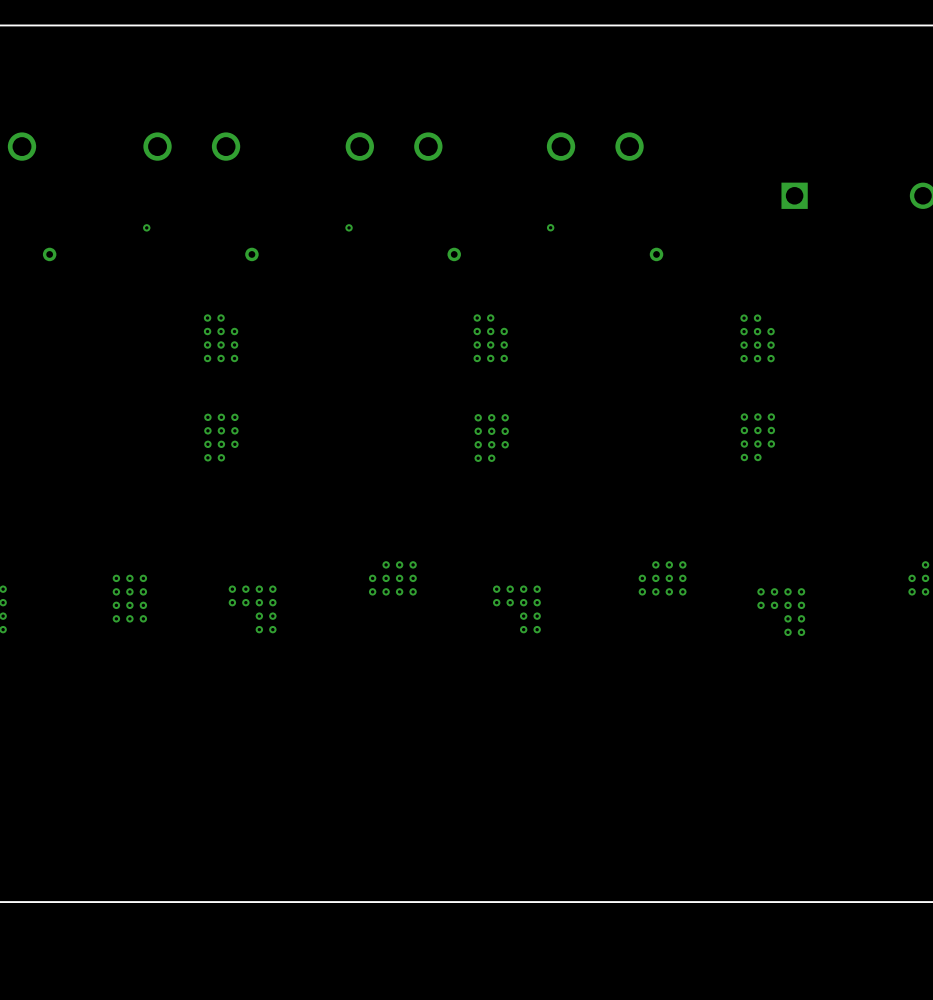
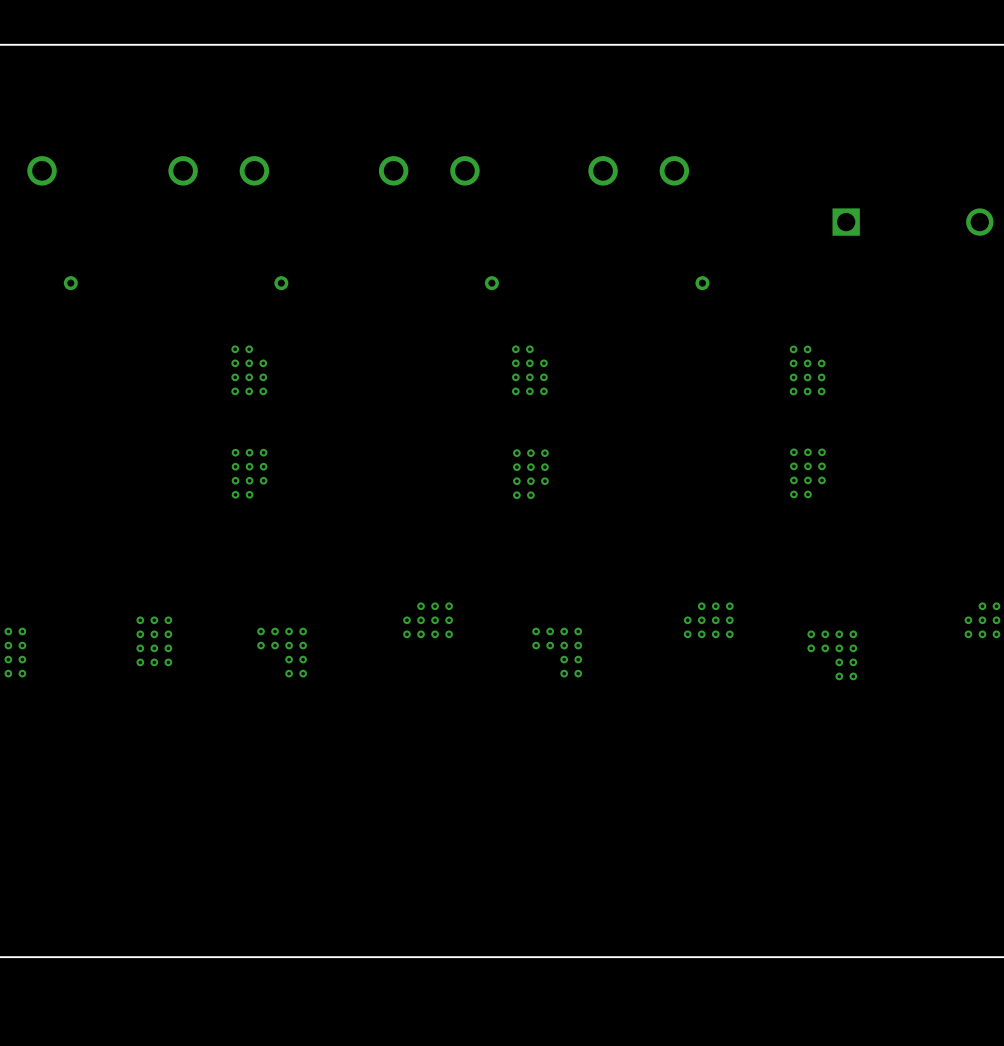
via: (146, 227) -> none
via: (349, 227) -> none
via: (550, 227) -> none

